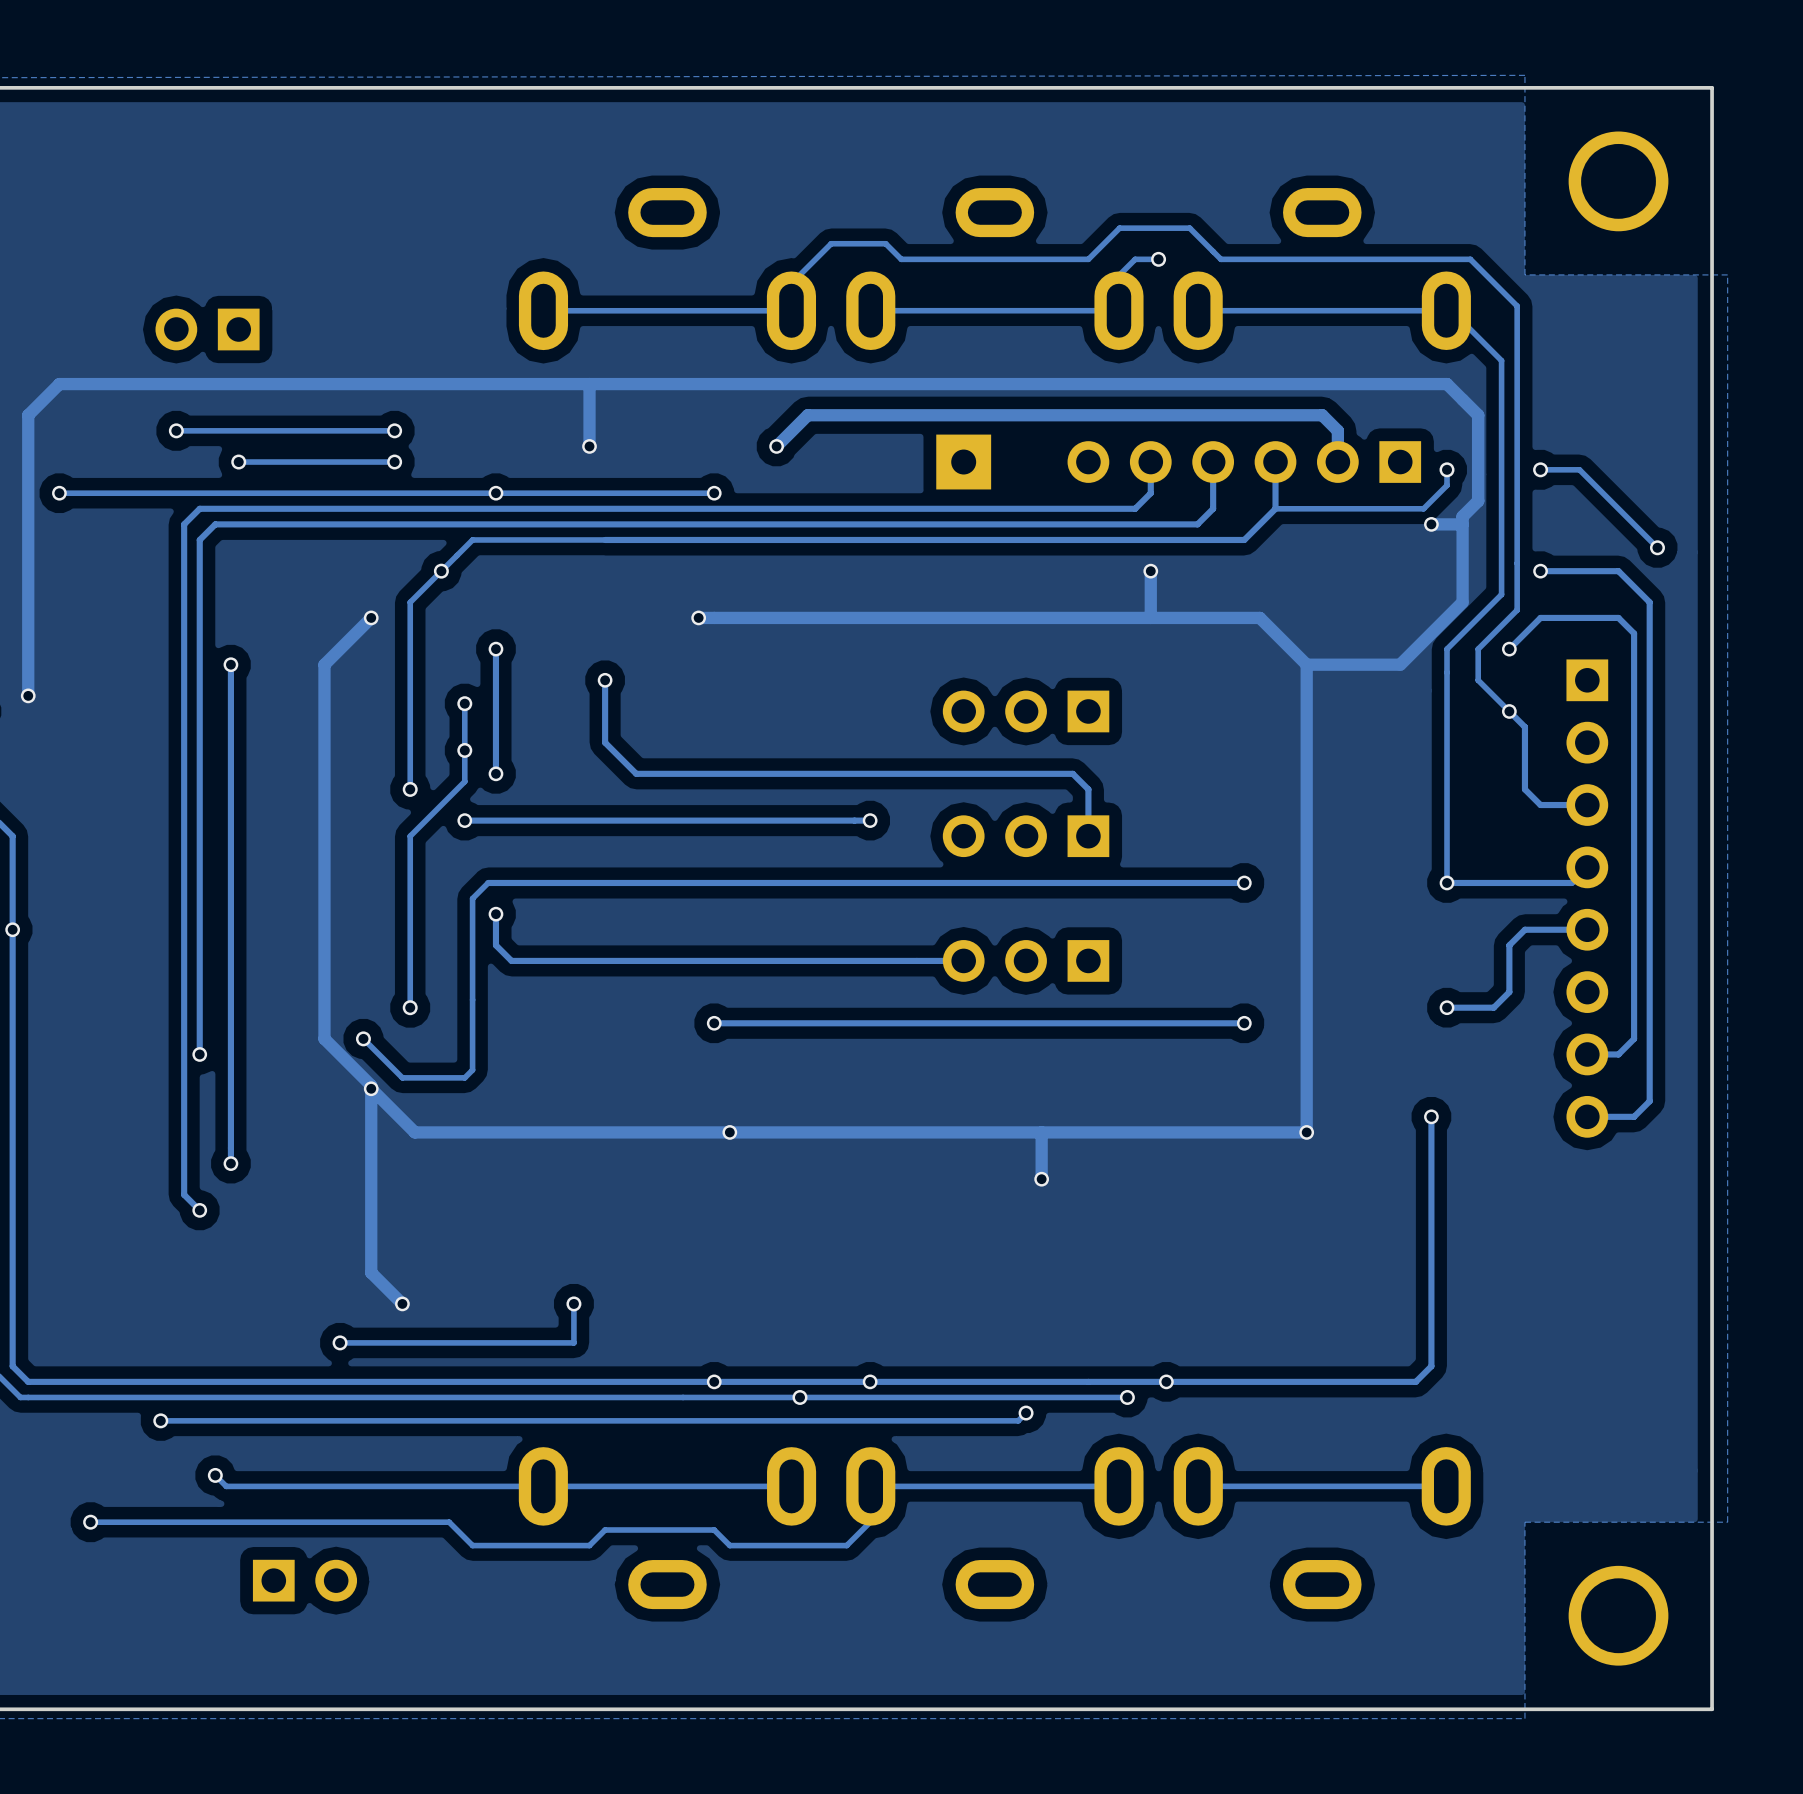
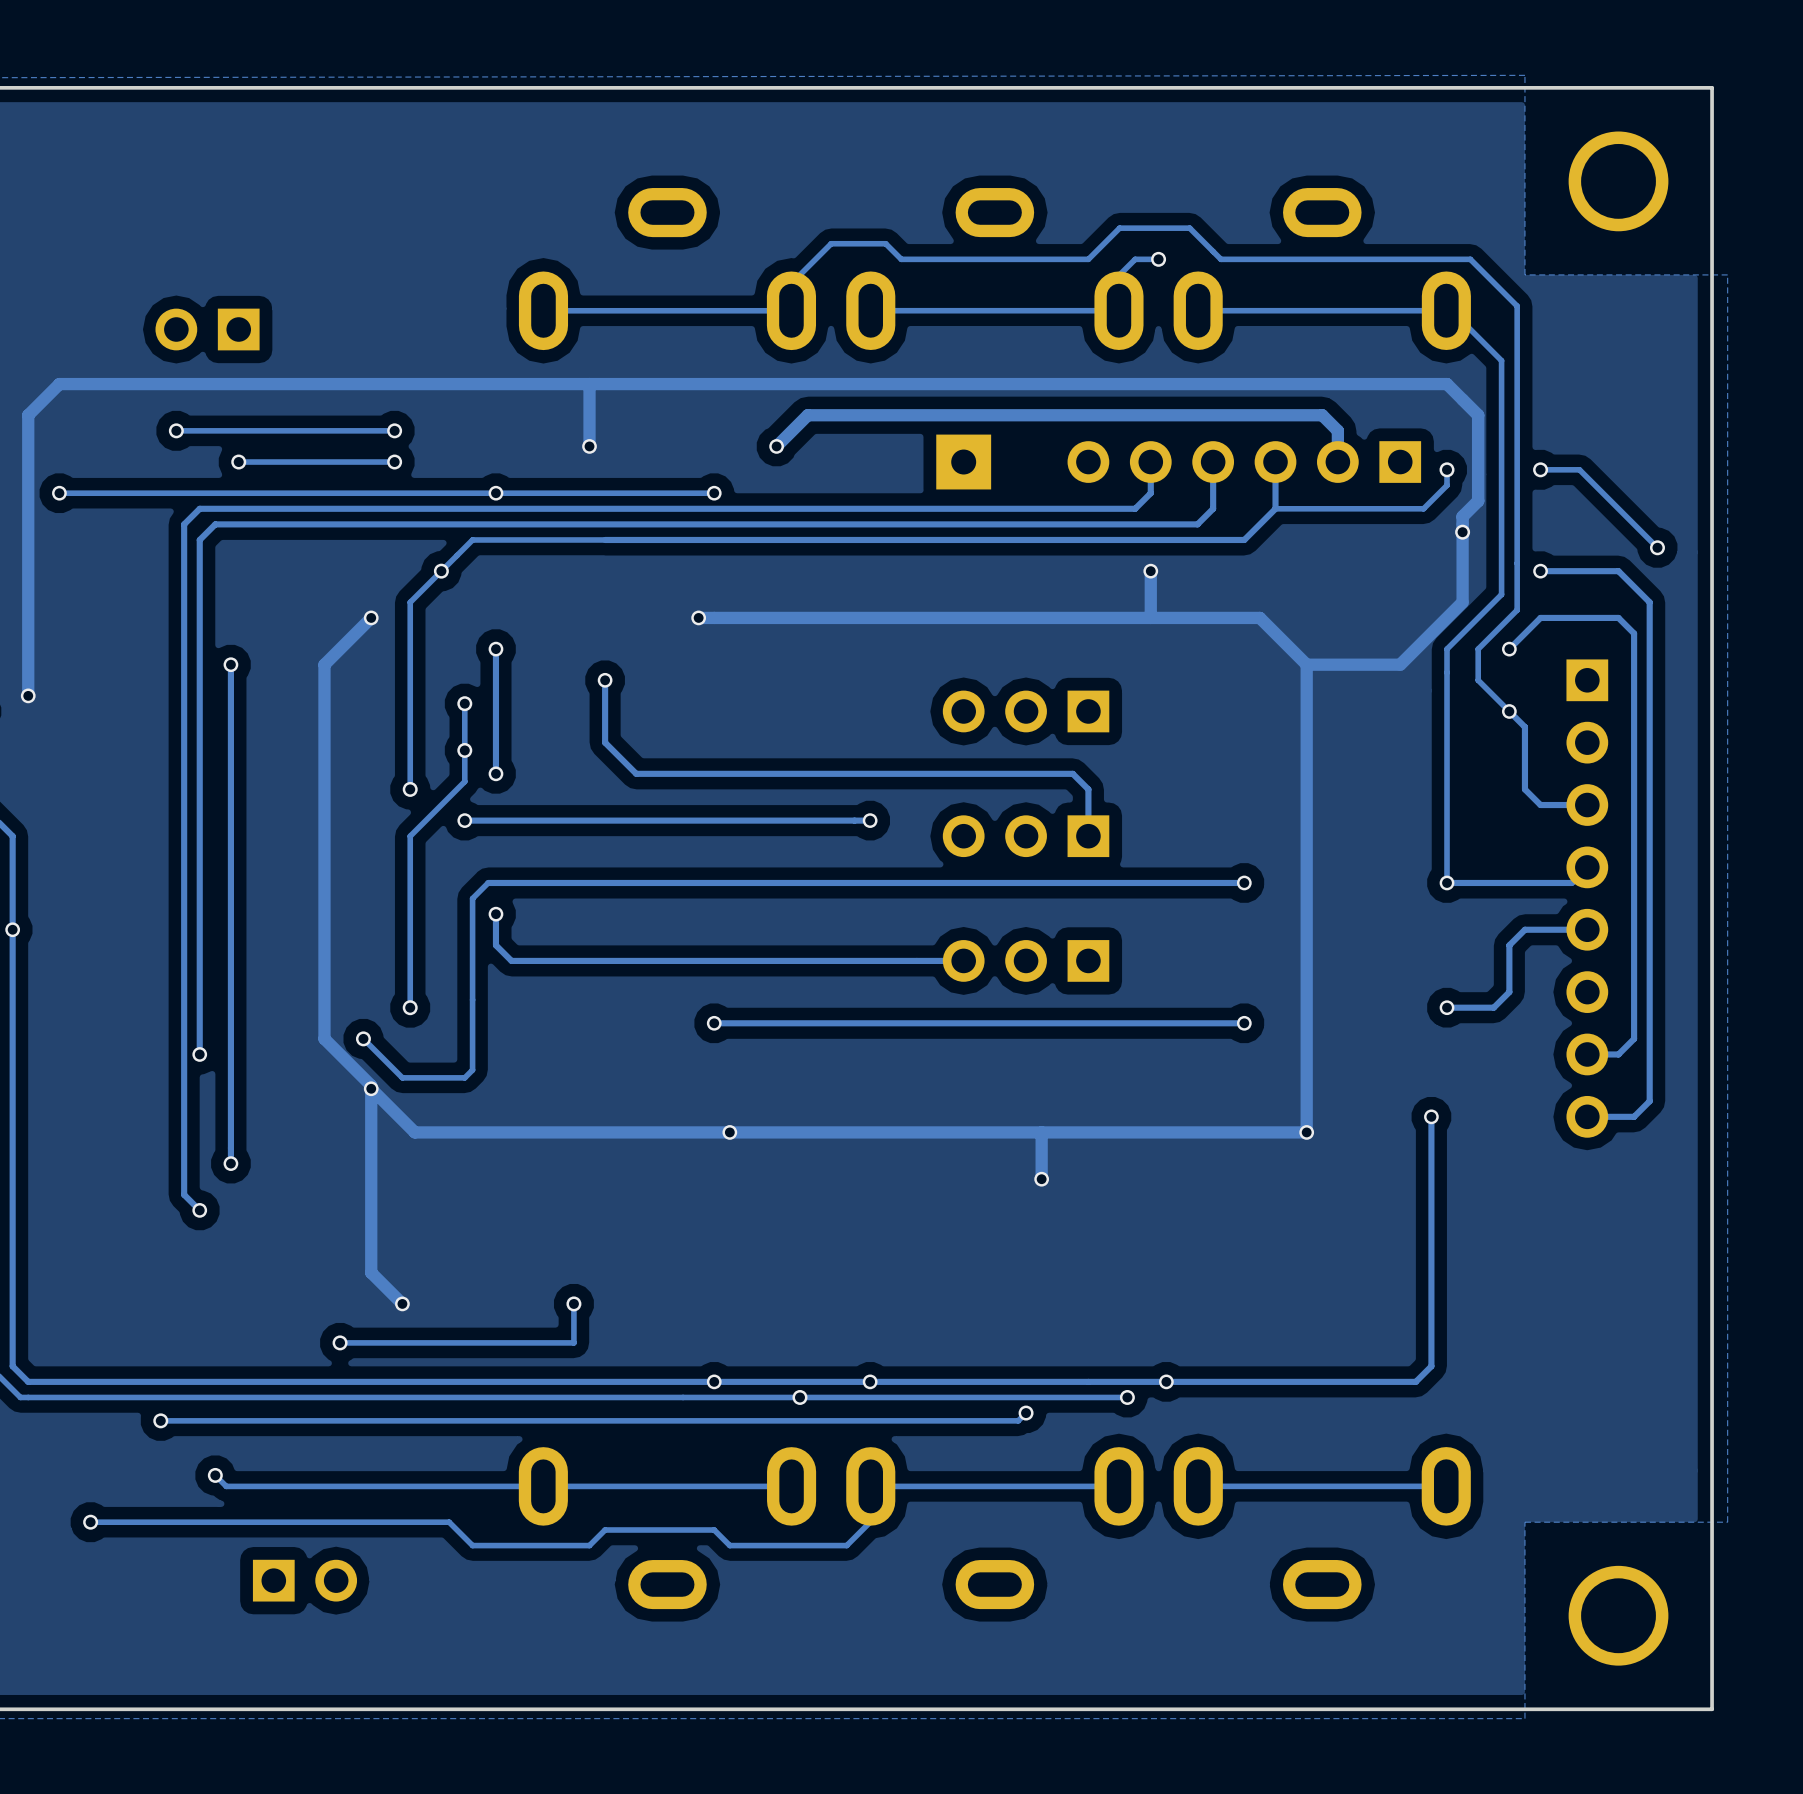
via position: (1431, 524) -> (1462, 532)
track: (1462, 524) (1431, 524) -> none

